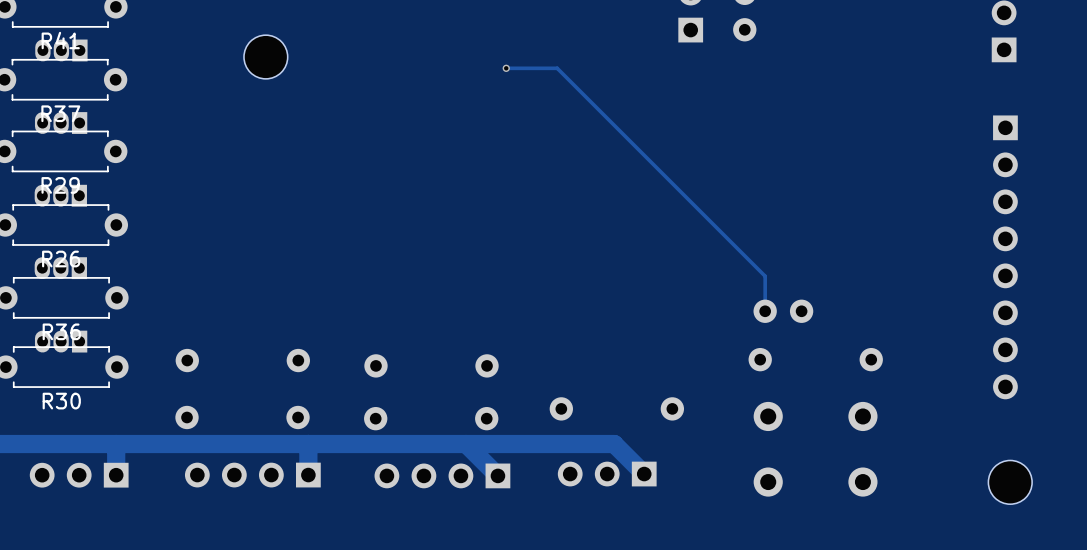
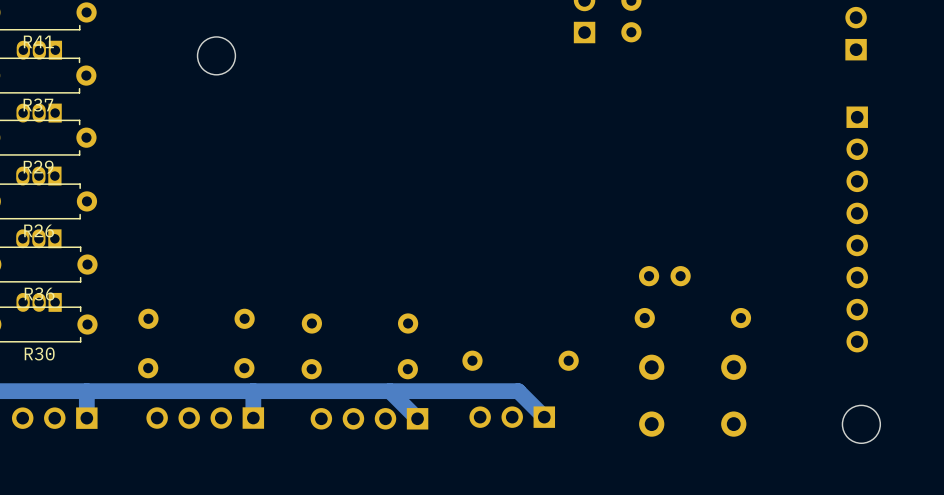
track: (506, 68) (557, 68) (765, 276) (765, 311) -> none
via: (506, 68) -> none

